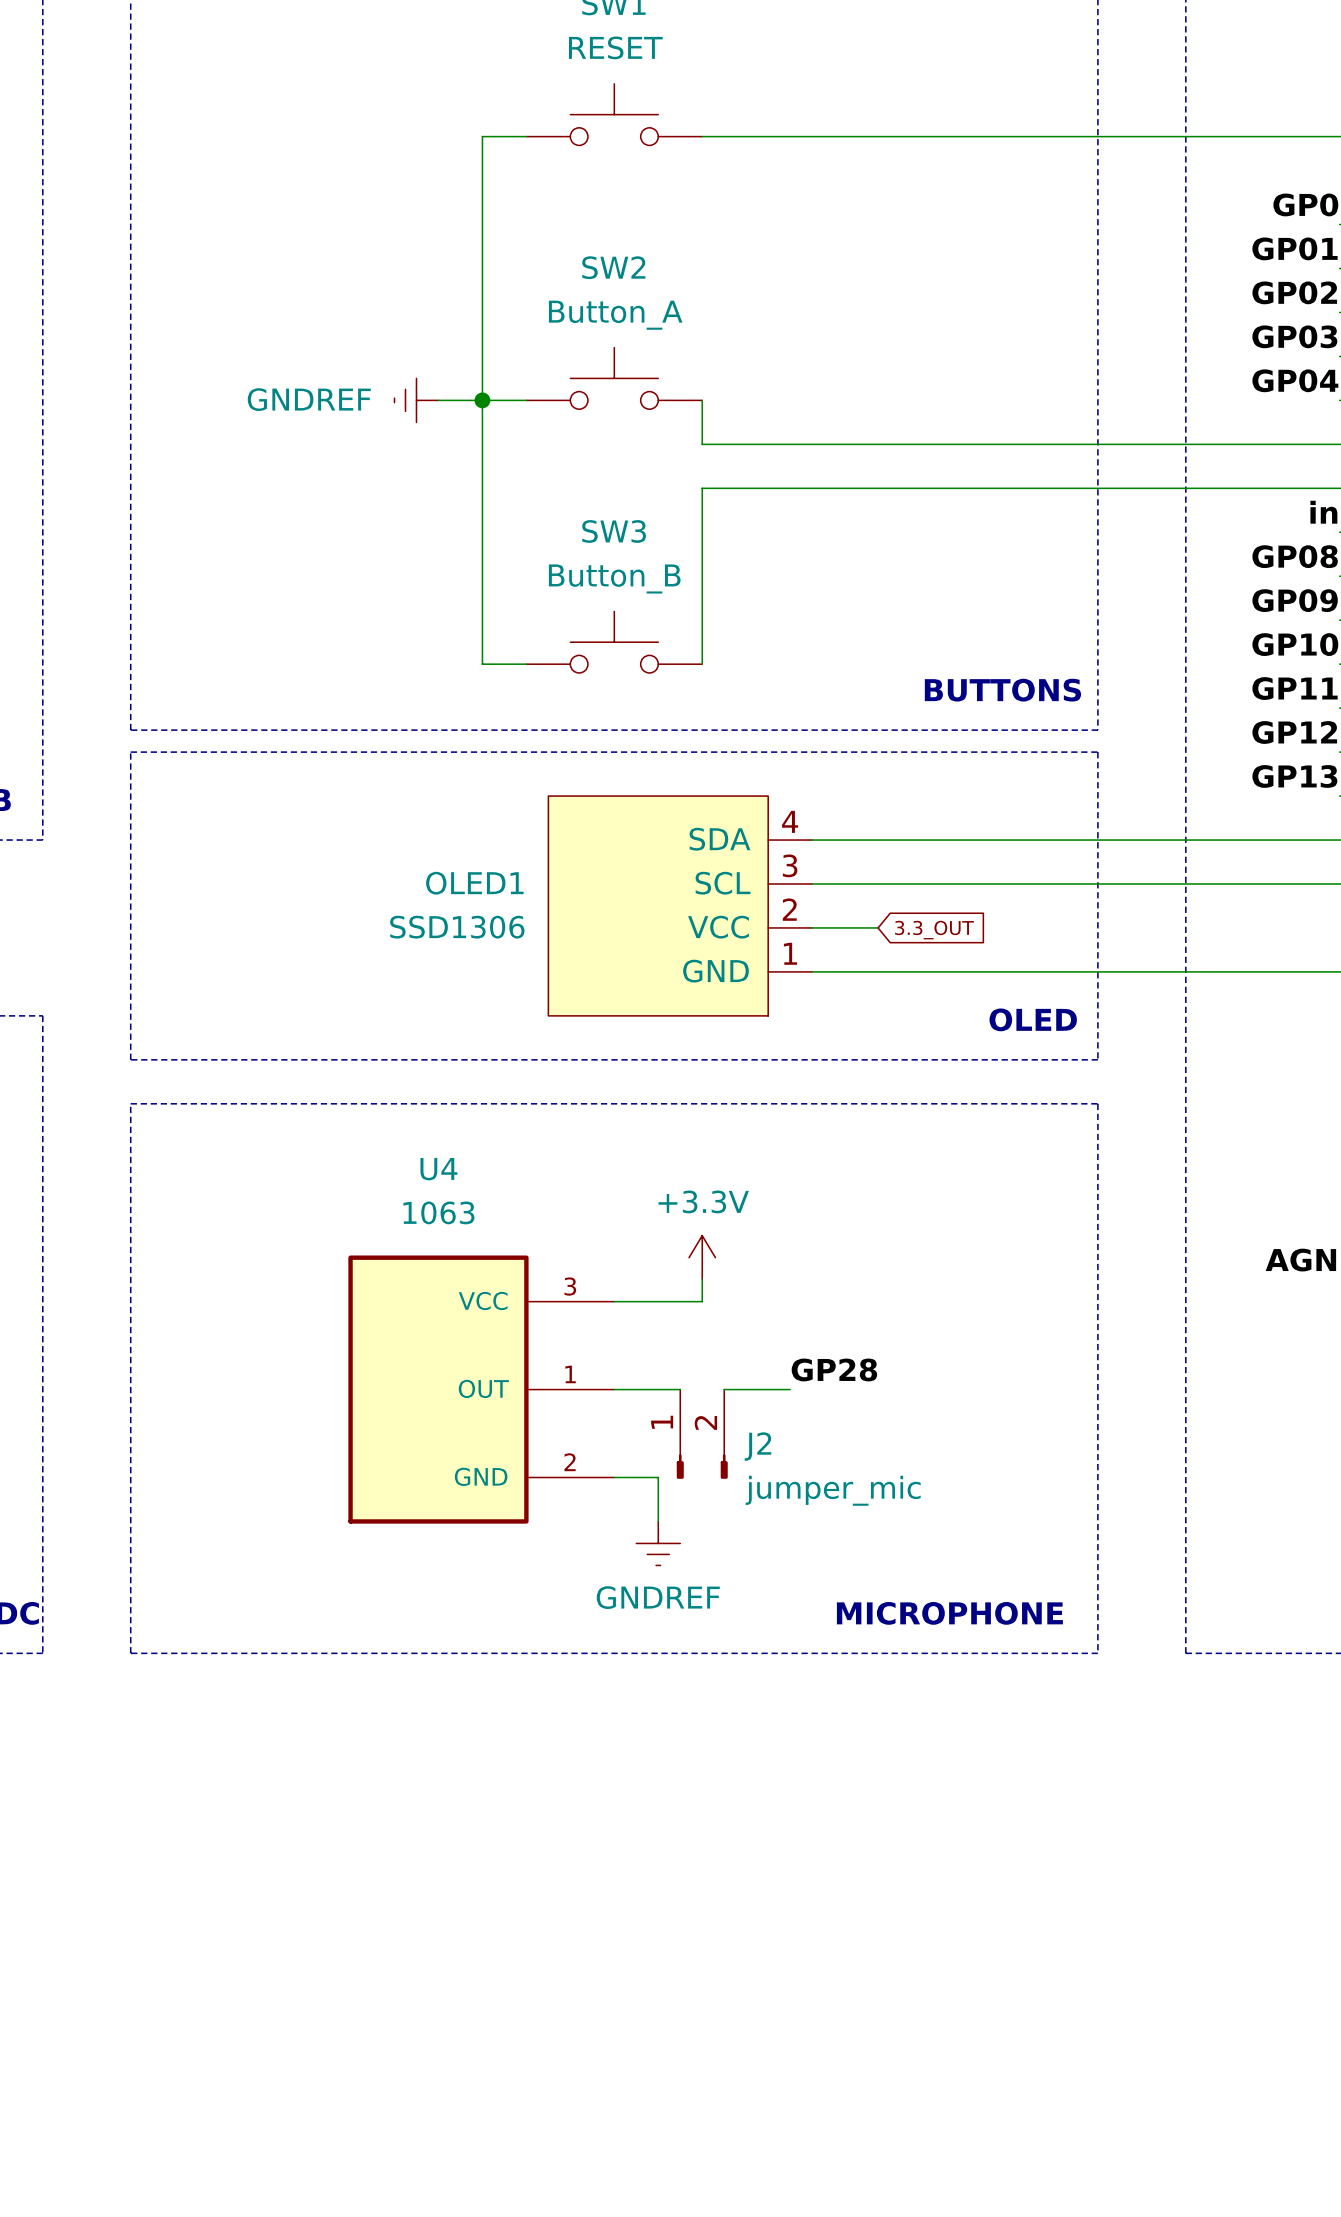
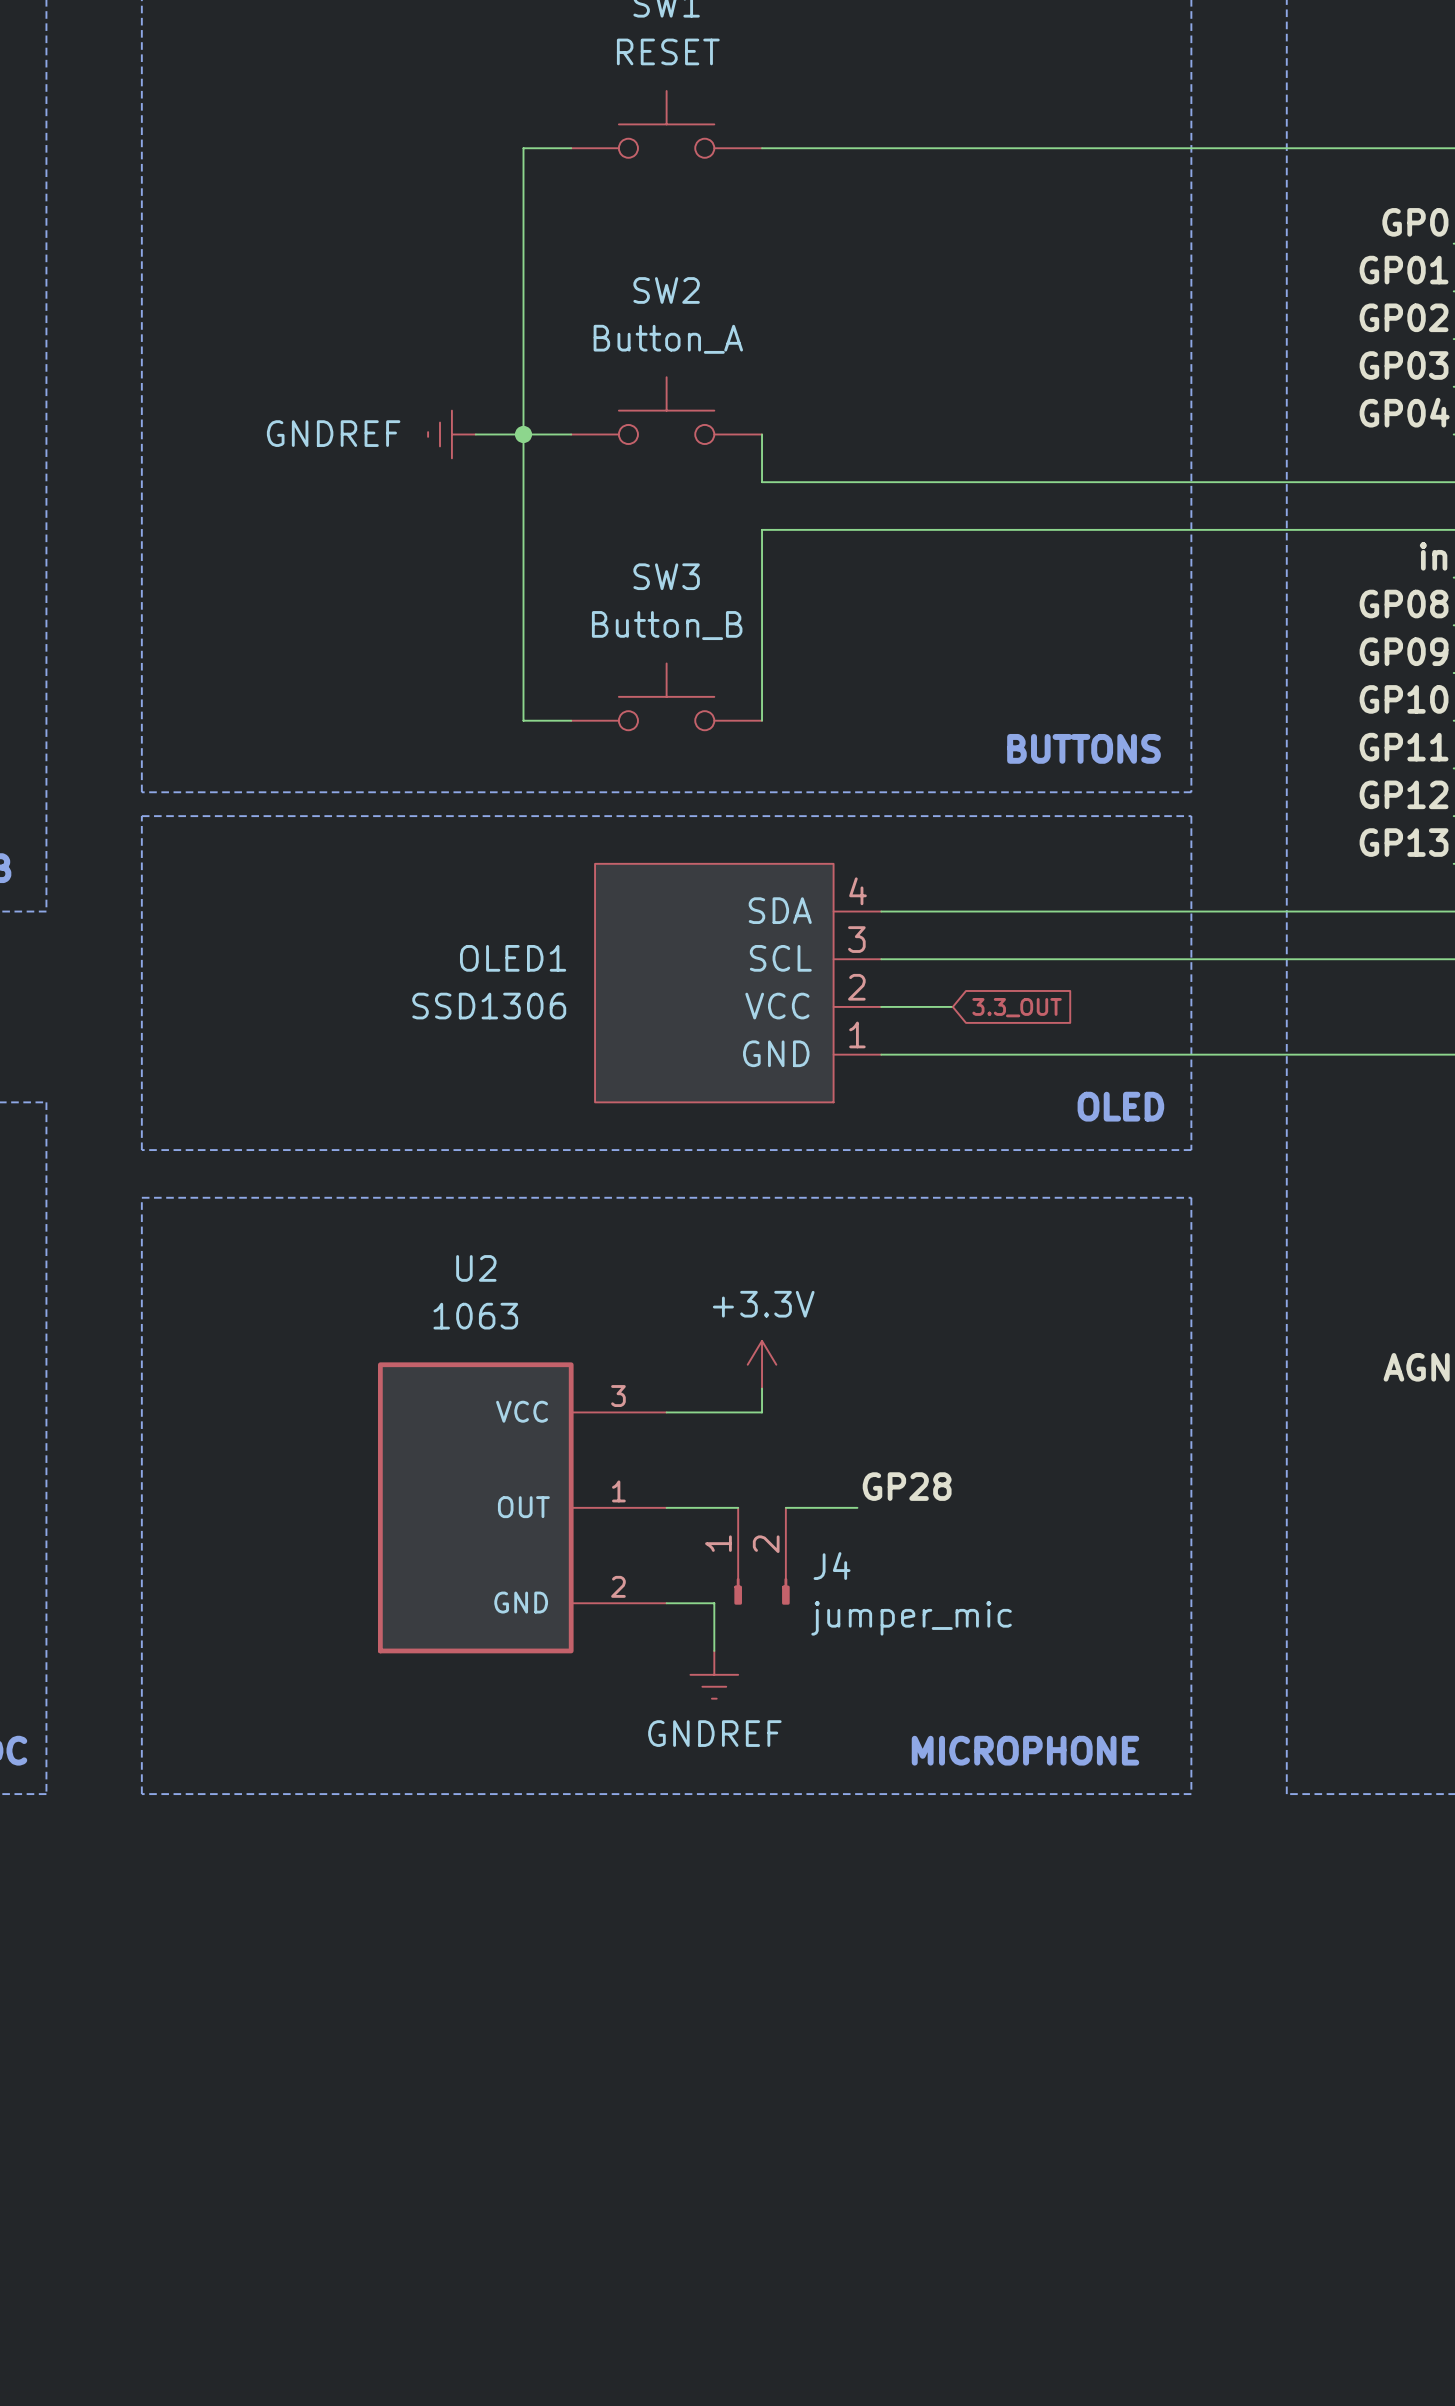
U4 name: U4 (438, 1169) -> U2 (476, 1268)
J2 name: J2 (757, 1446) -> J4 (832, 1566)

